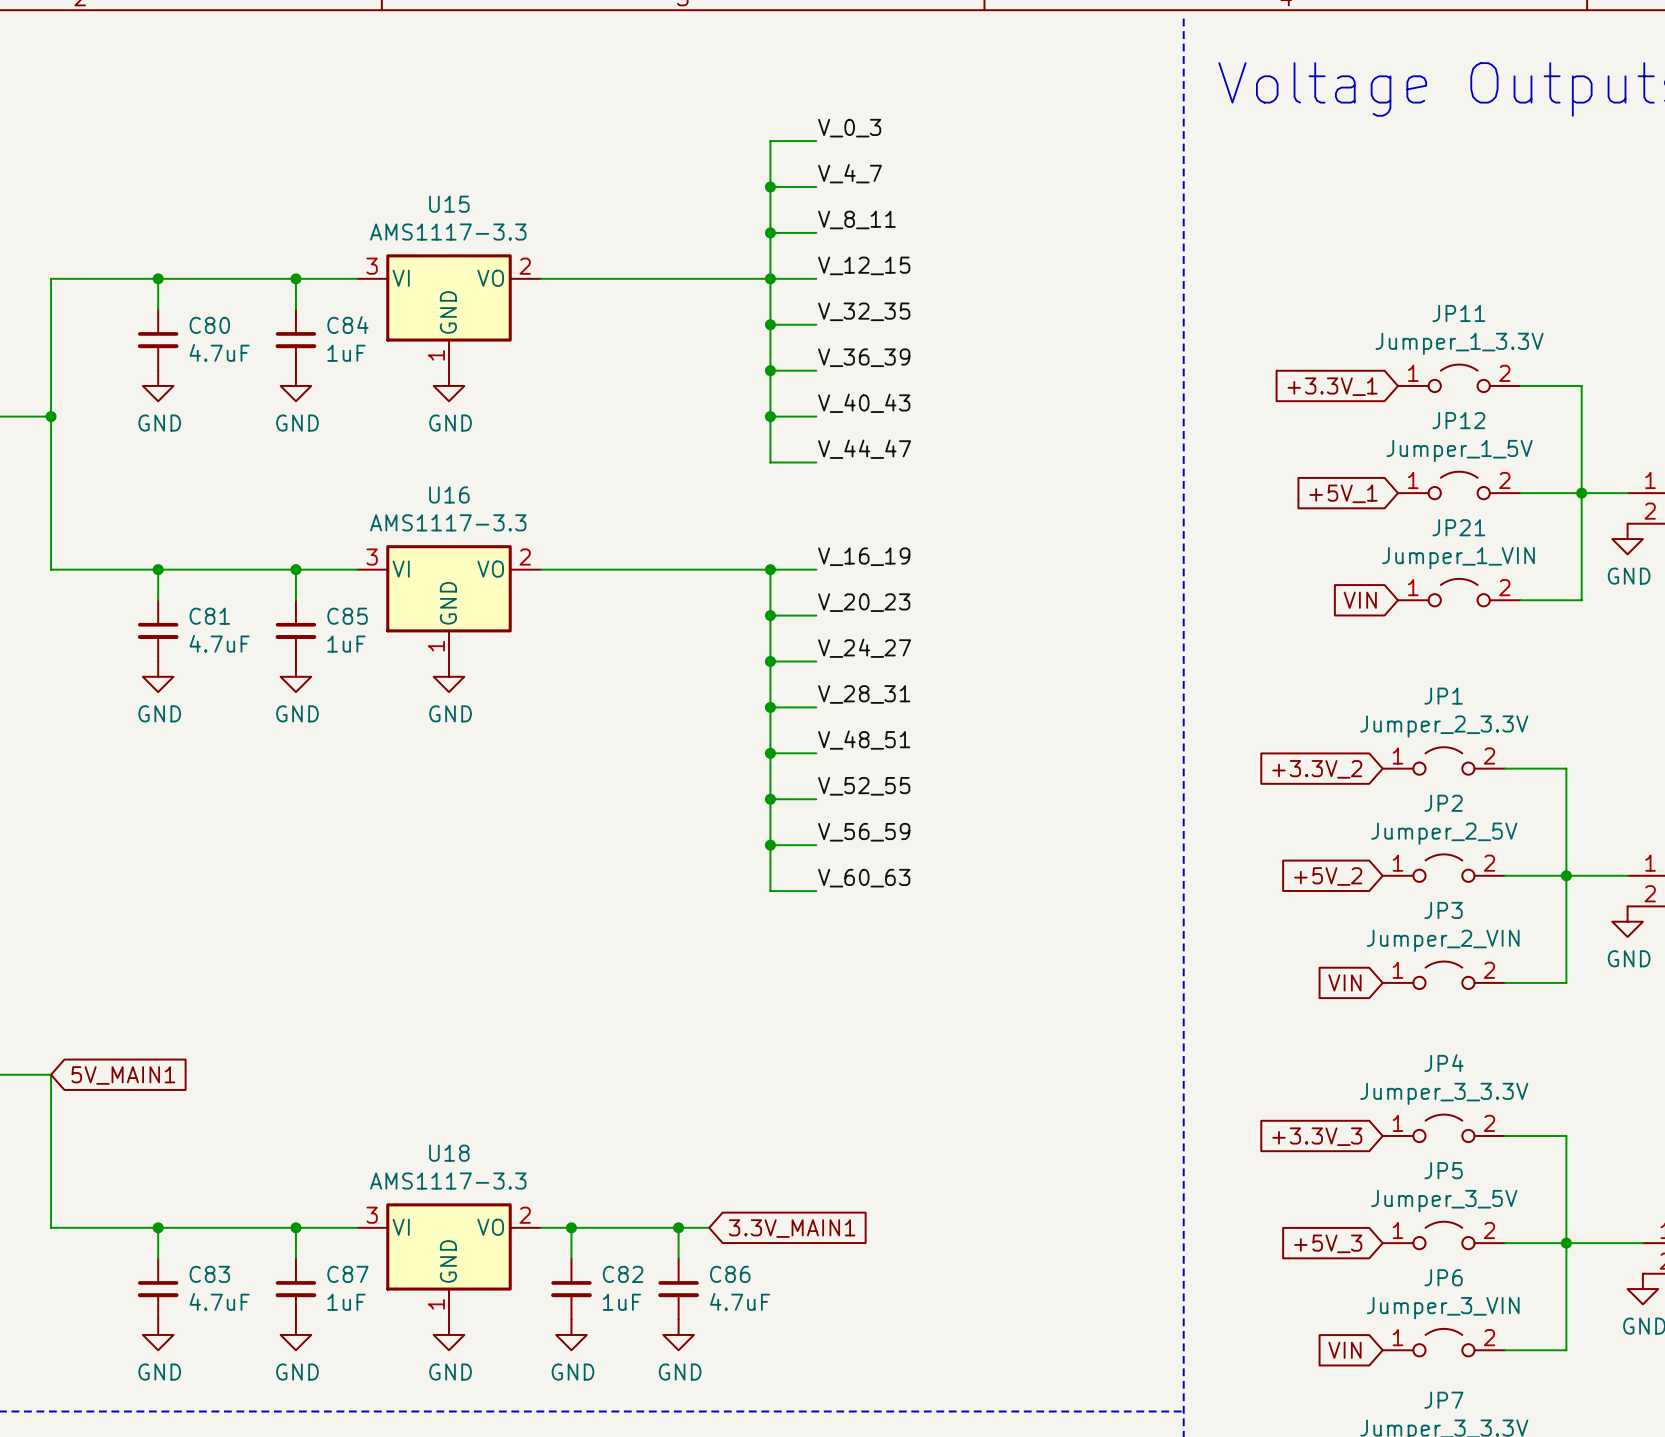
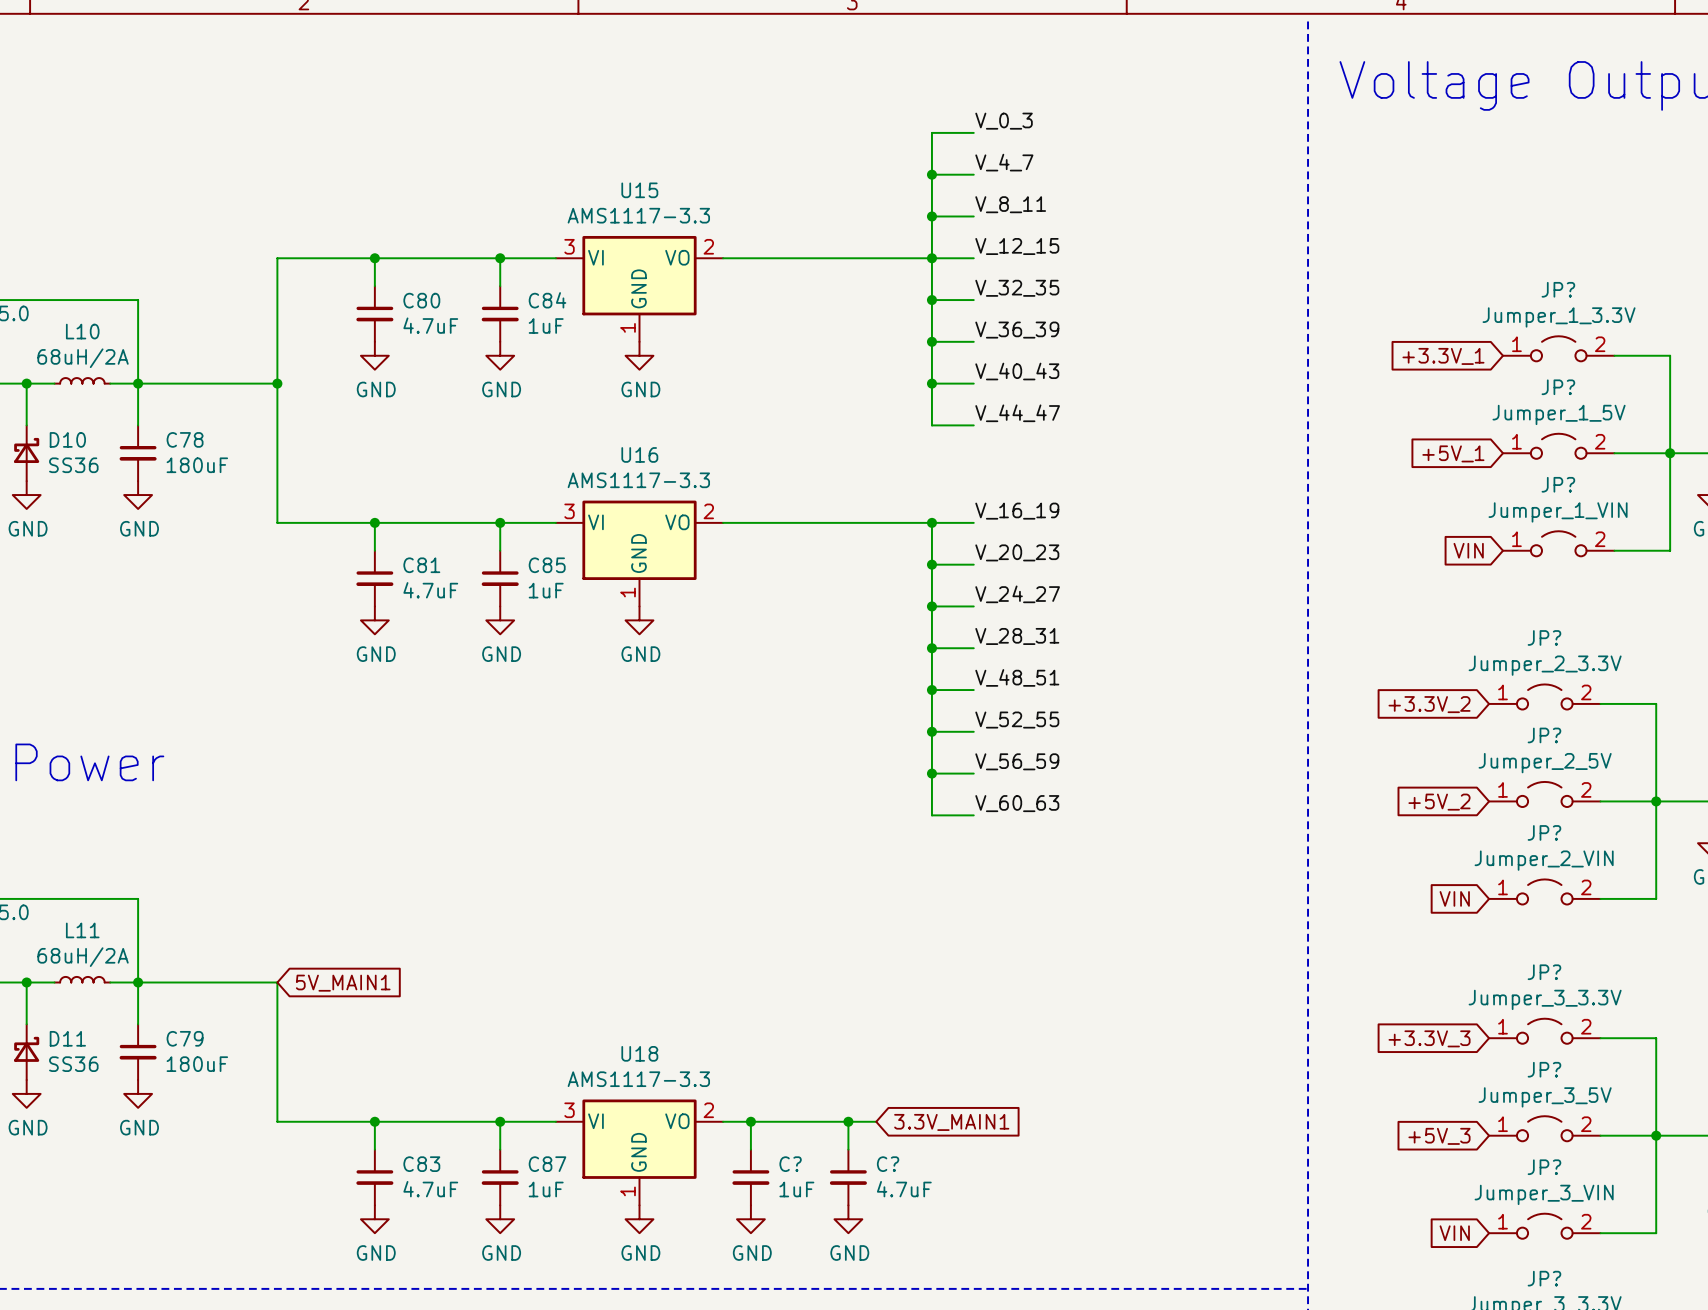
JP11 name: JP11 (1458, 313) -> JP? (1558, 289)
JP12 name: JP12 (1458, 420) -> JP? (1558, 387)
JP21 name: JP21 (1458, 527) -> JP? (1558, 484)
JP1 name: JP1 (1443, 696) -> JP? (1544, 637)
JP2 name: JP2 (1443, 803) -> JP? (1544, 735)
JP3 name: JP3 (1443, 910) -> JP? (1544, 832)
JP4 name: JP4 (1443, 1063) -> JP? (1544, 972)
JP5 name: JP5 (1443, 1170) -> JP? (1544, 1069)
C82 name: C82 (623, 1274) -> C? (790, 1164)
C86 name: C86 (730, 1274) -> C? (888, 1164)
JP6 name: JP6 (1443, 1277) -> JP? (1544, 1167)
JP7 name: JP7 (1443, 1400) -> JP? (1544, 1278)

